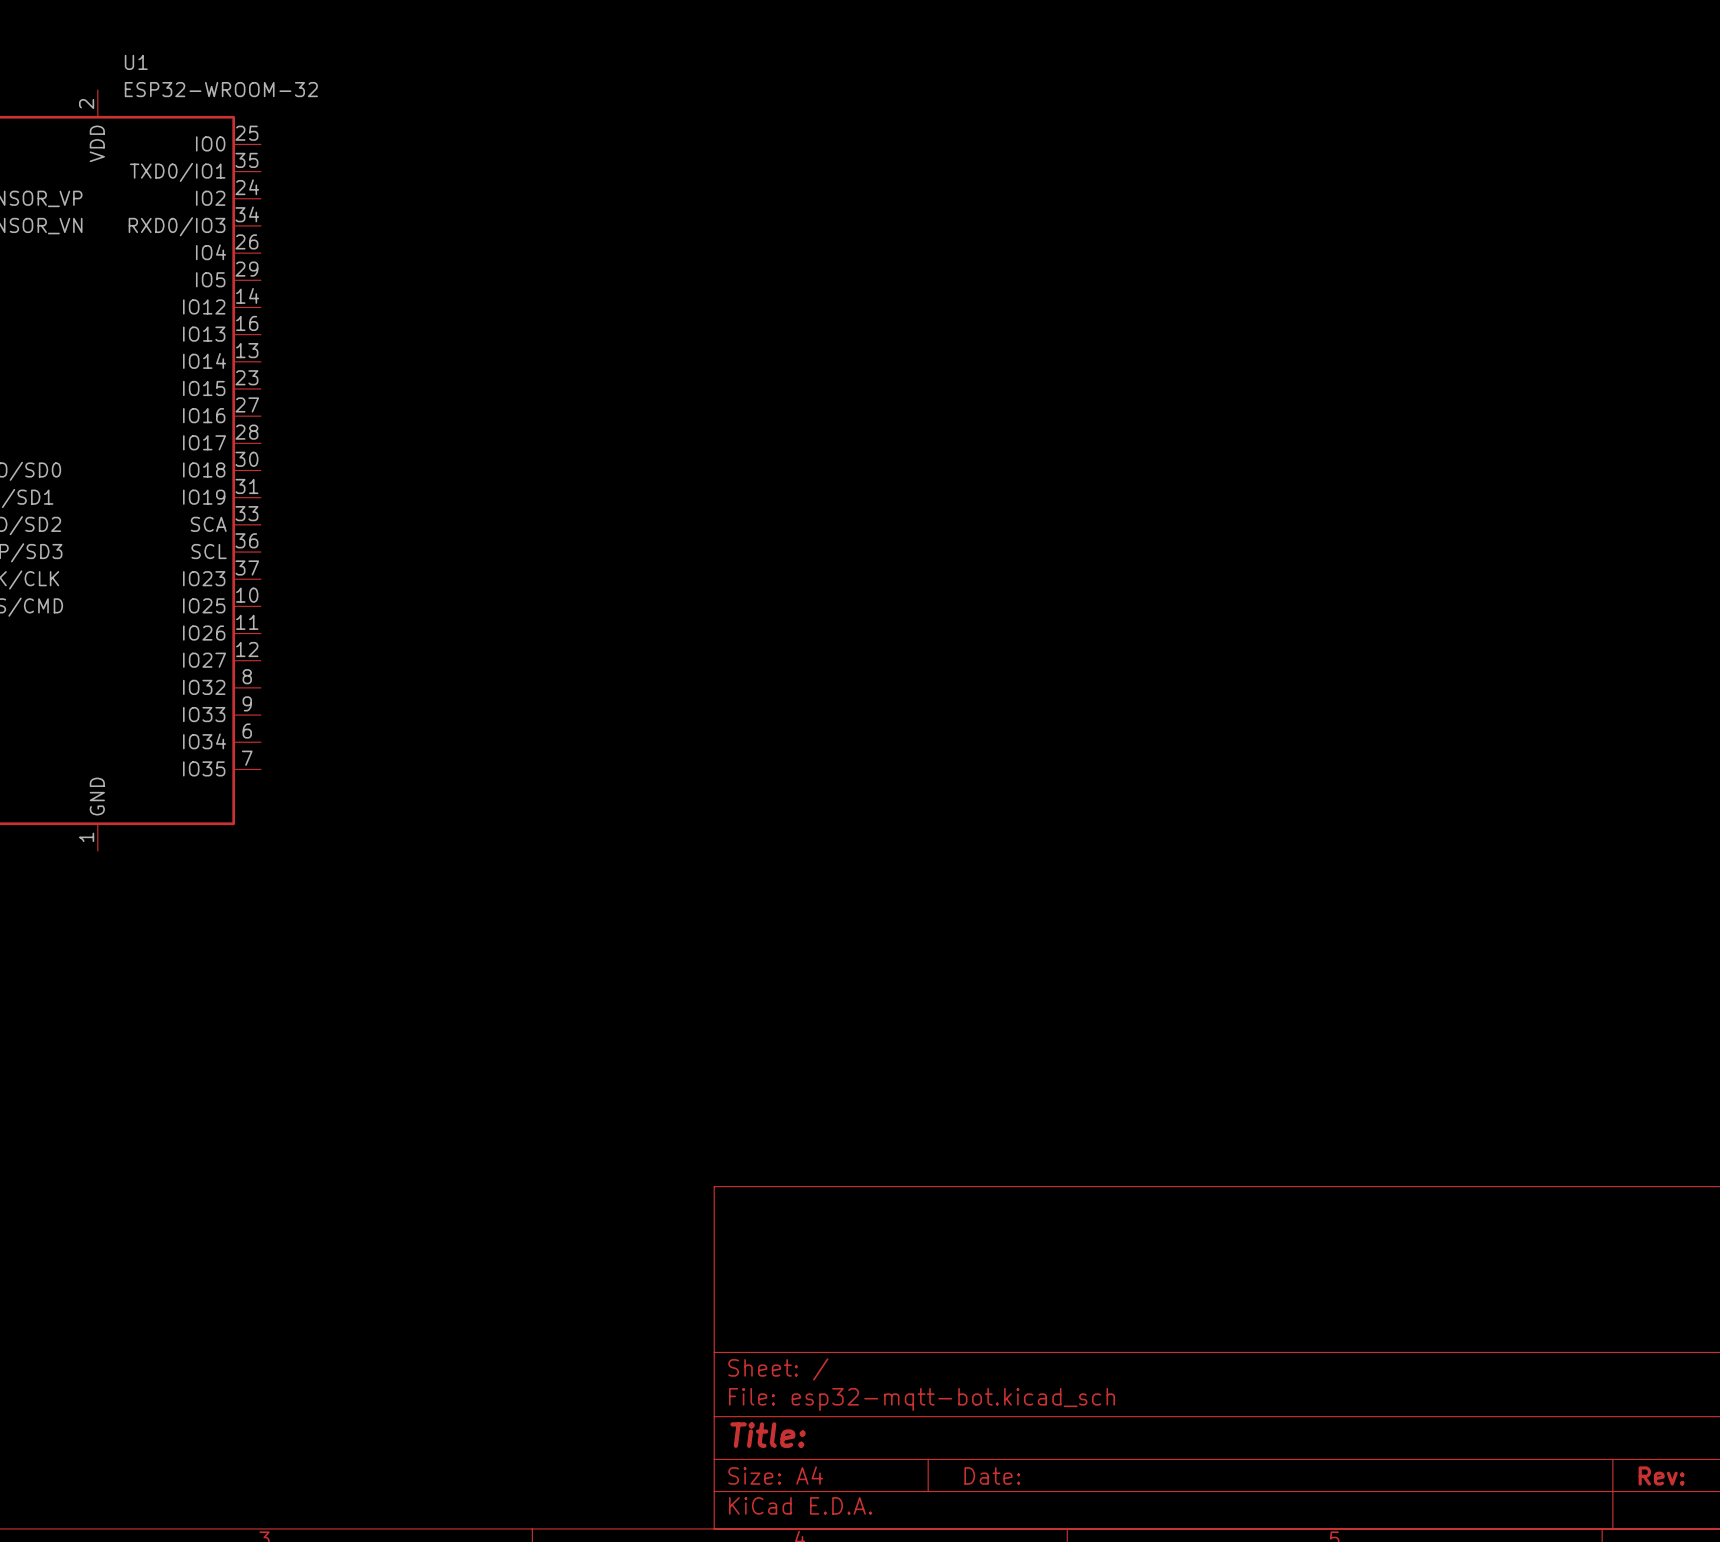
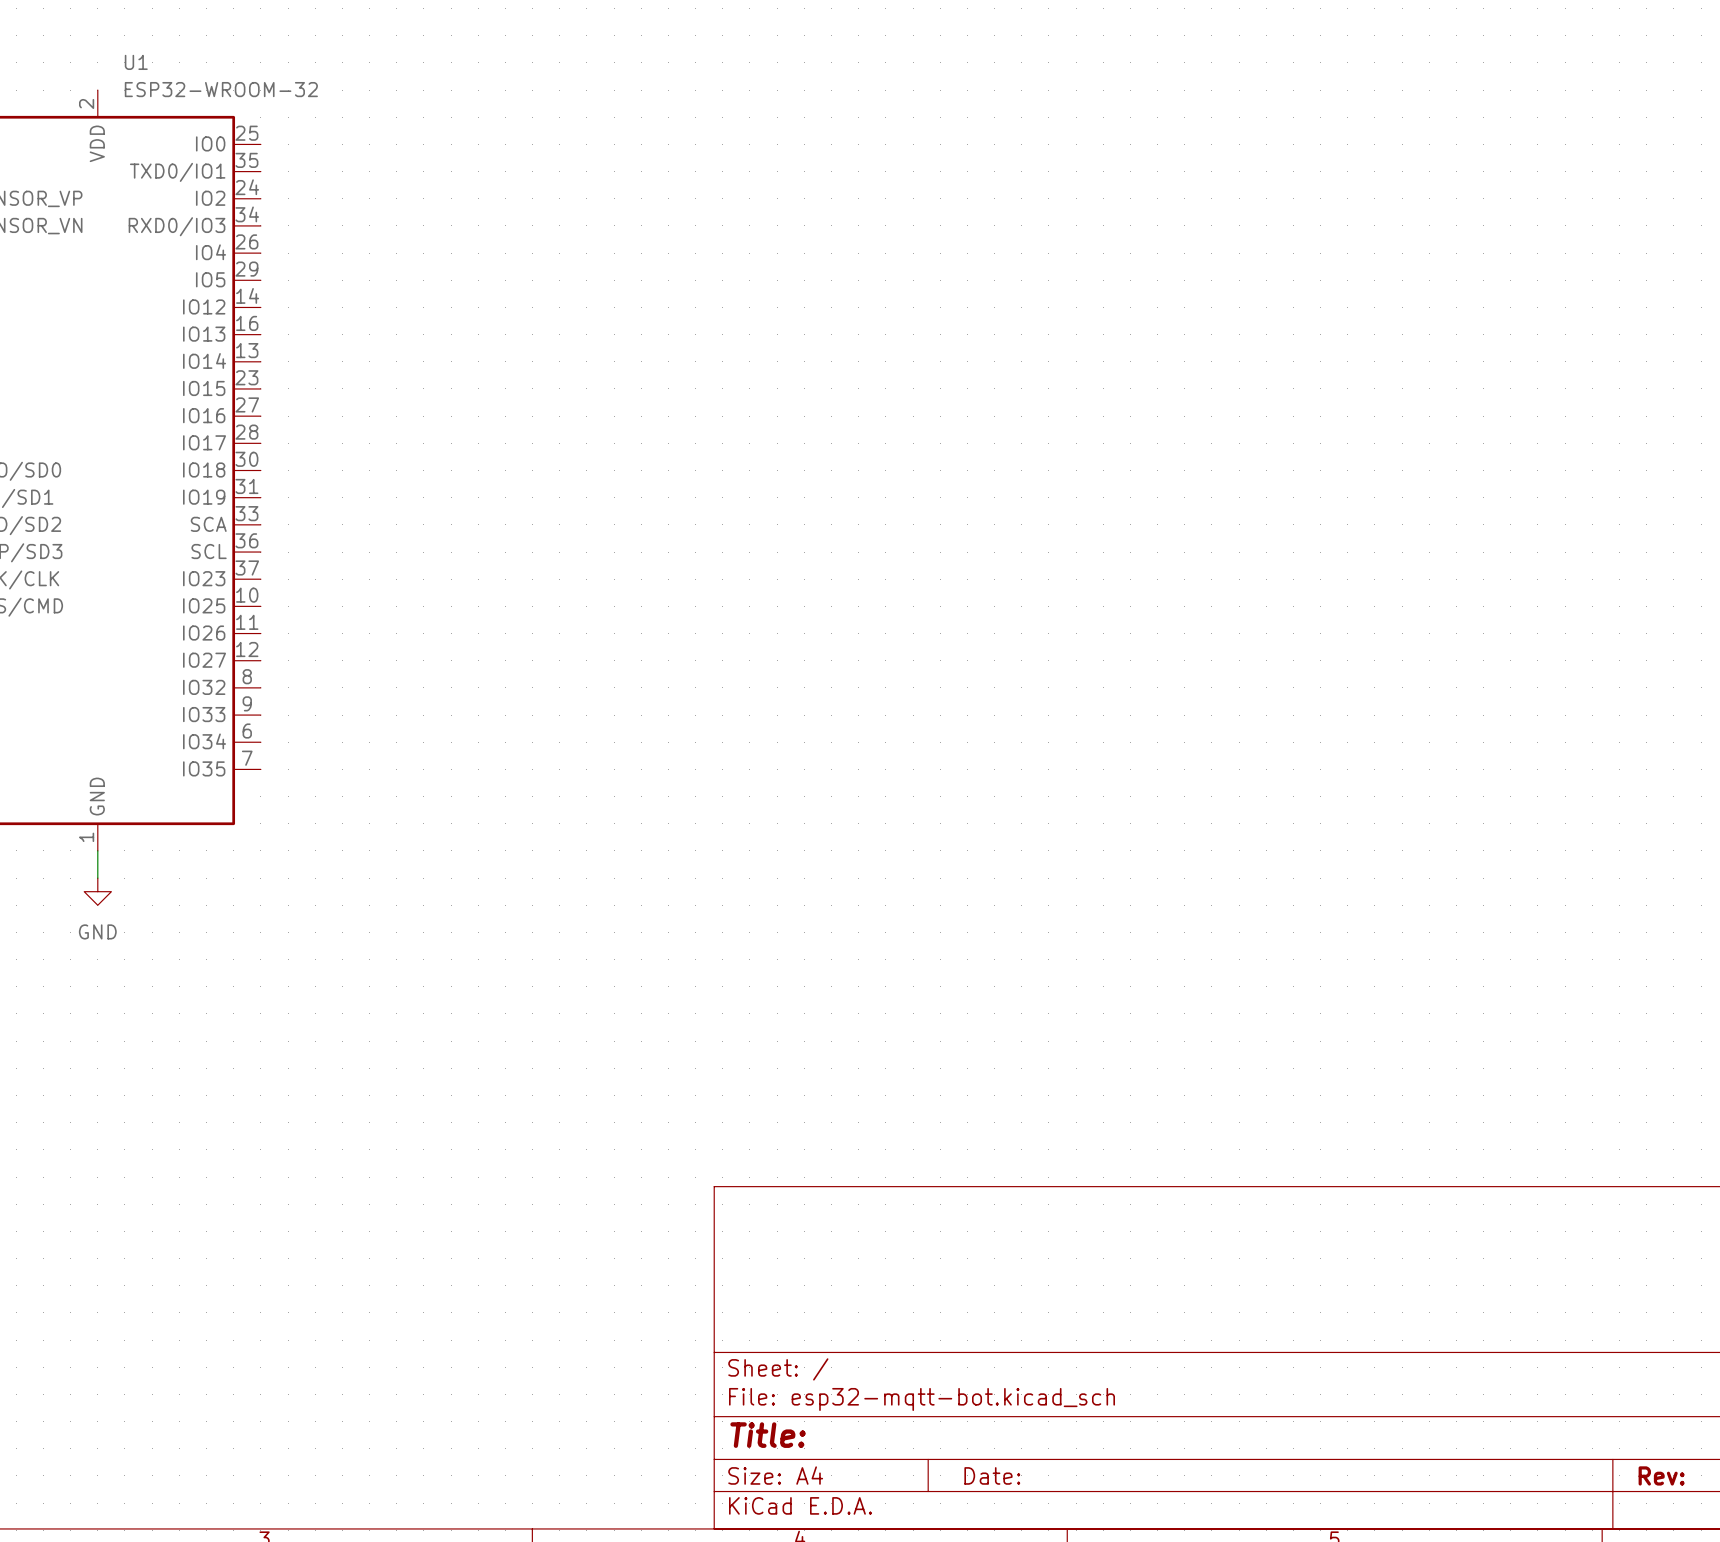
wire: none -> (97, 850) (97, 878)
power symbol: none -> GND (97, 891)

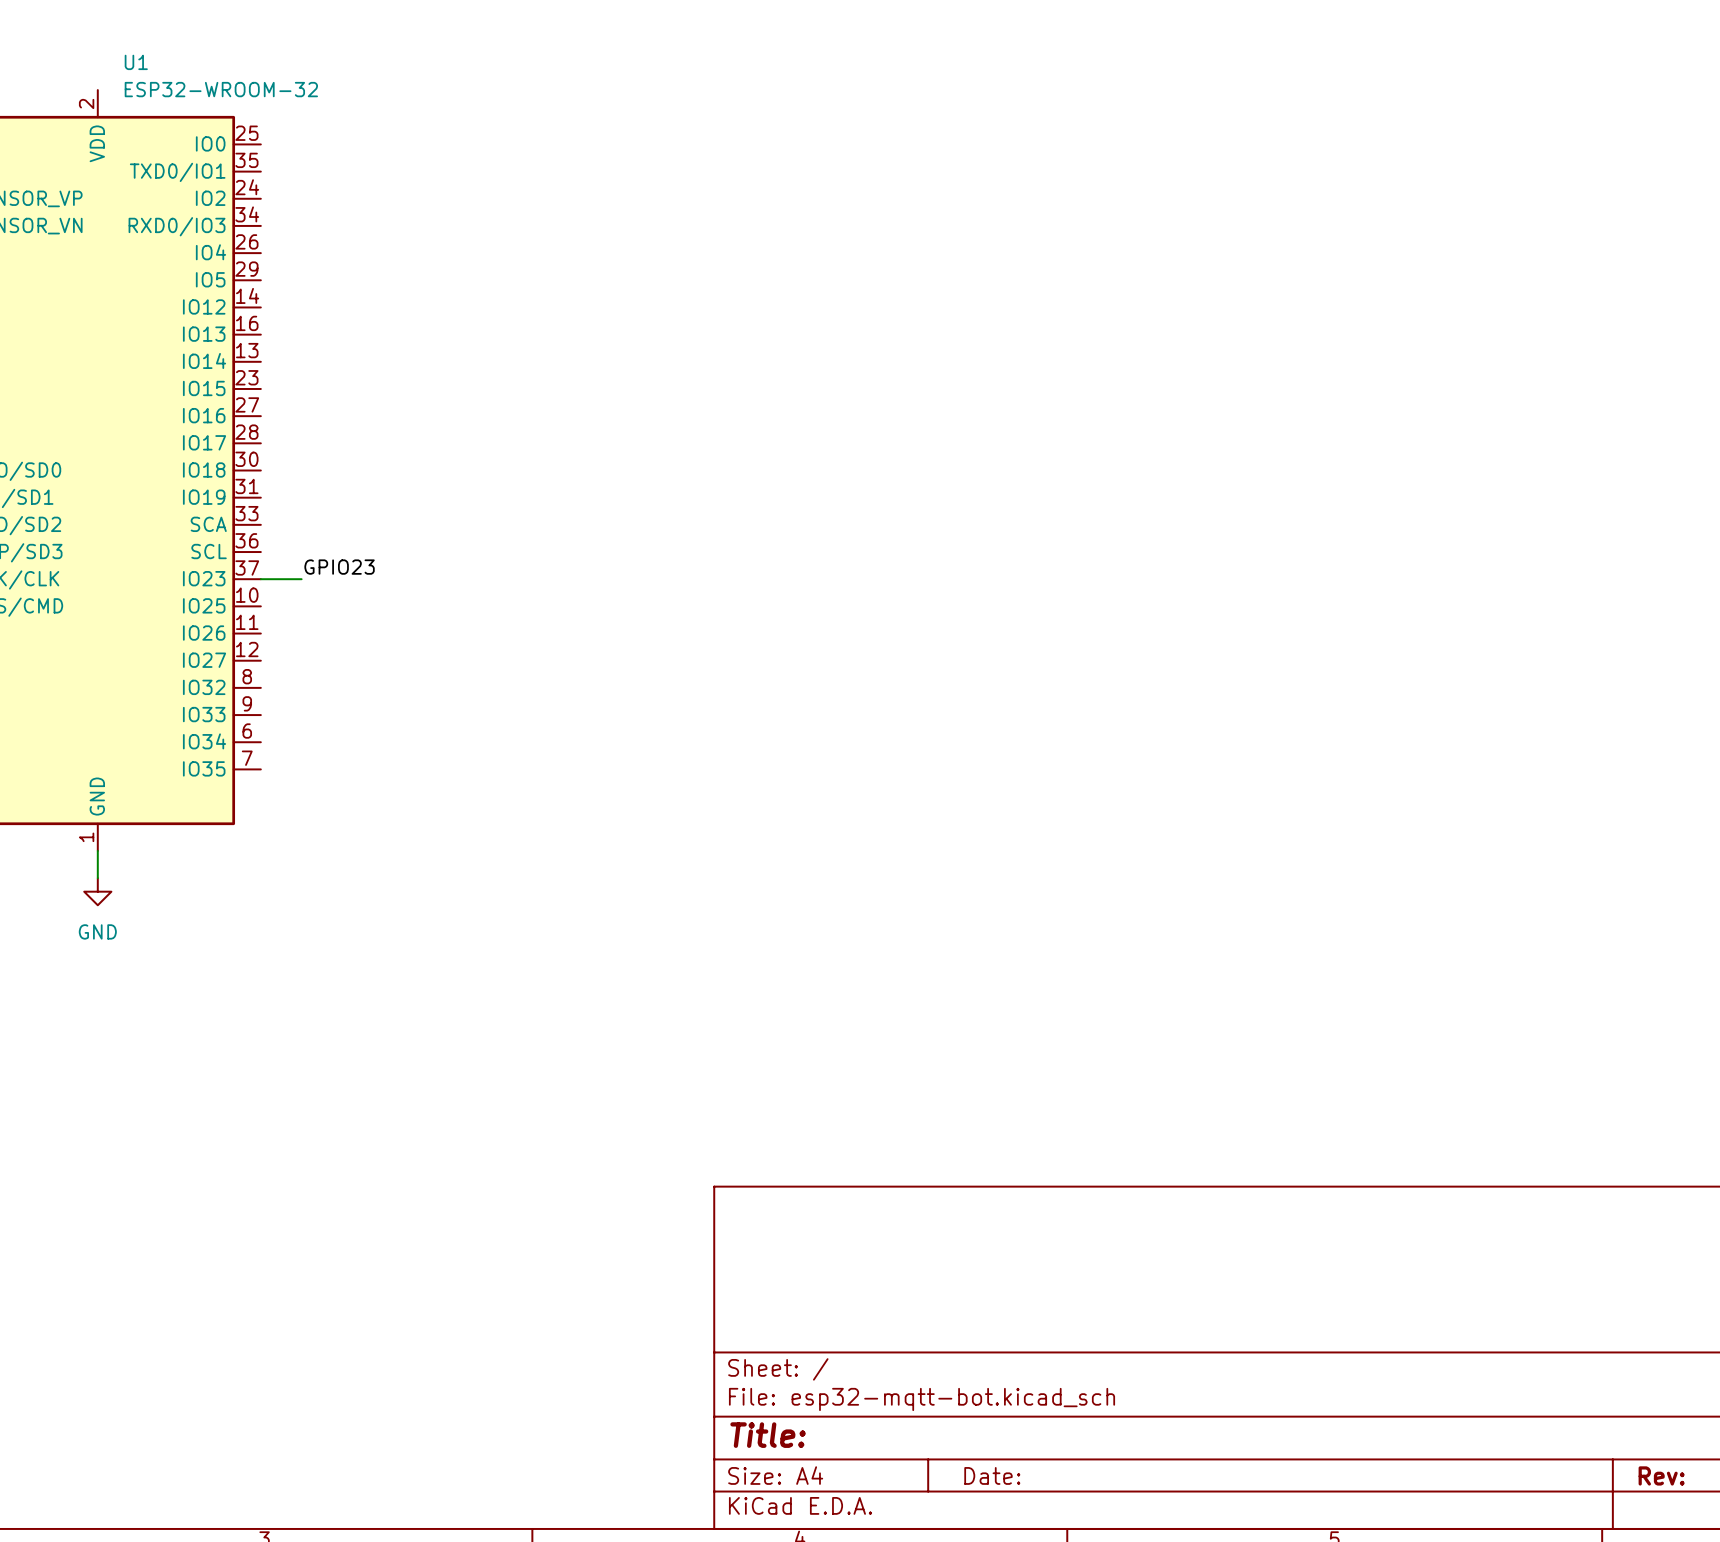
label: none -> GPIO23 (339, 567)
wire: none -> (260, 579) (301, 579)

